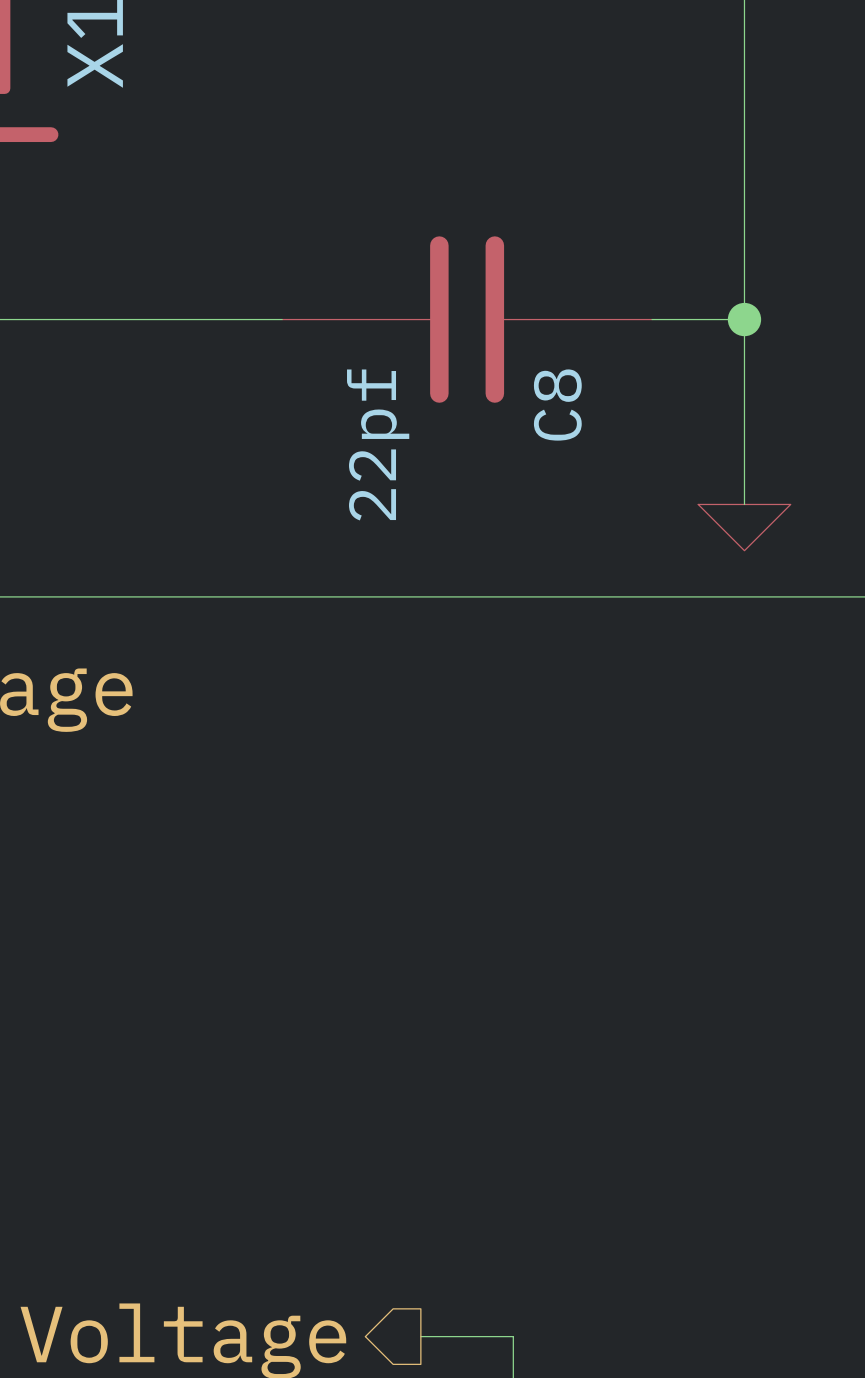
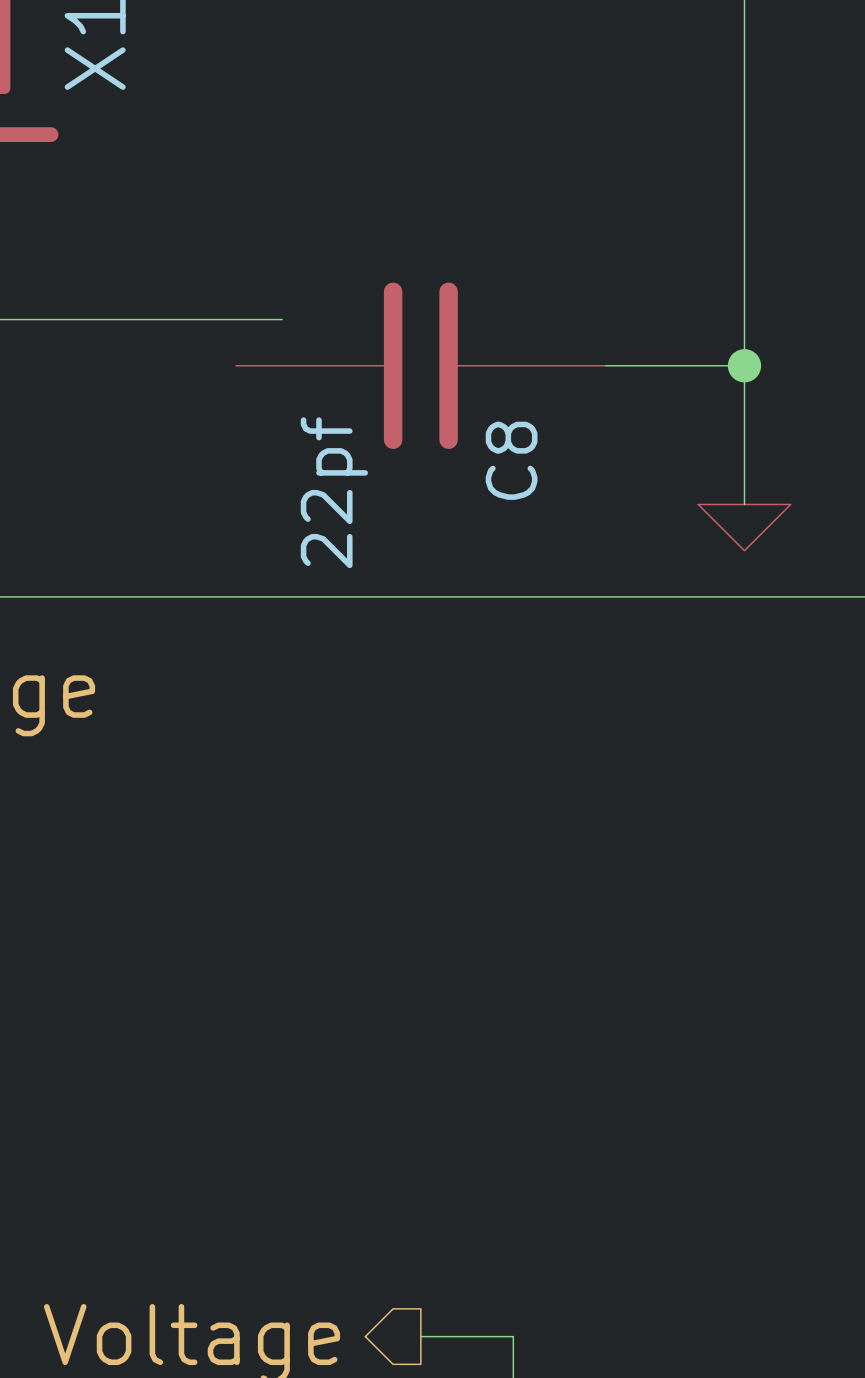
C8 position: (467, 319) -> (420, 365)
wire: (652, 319) (744, 319) -> none
junction position: (744, 319) -> (744, 365)
wire: none -> (605, 365) (744, 365)

